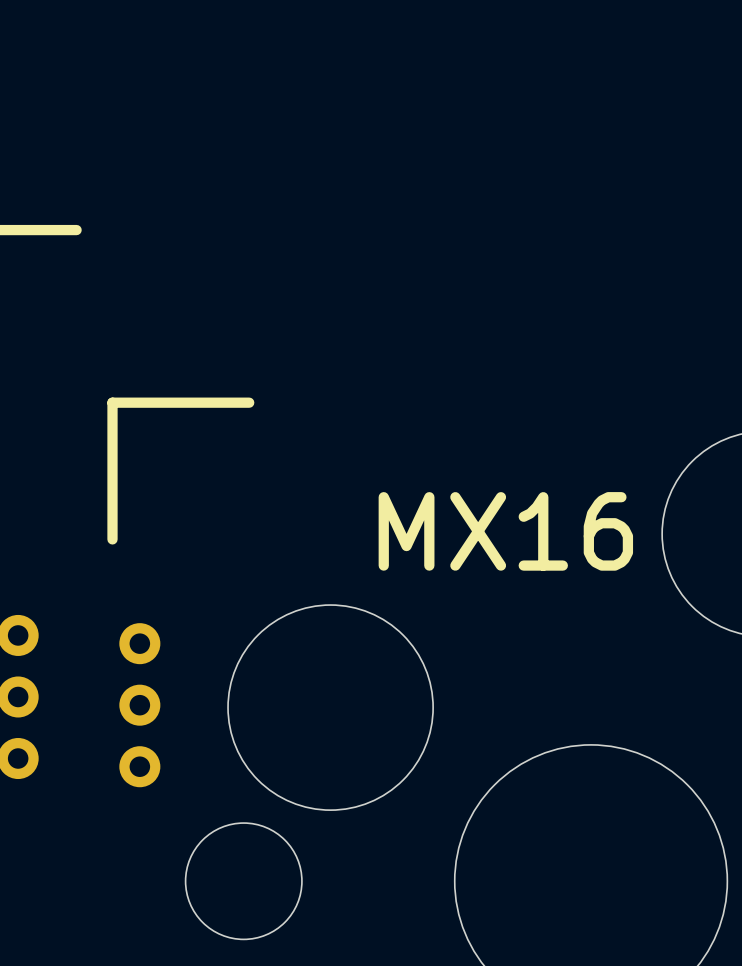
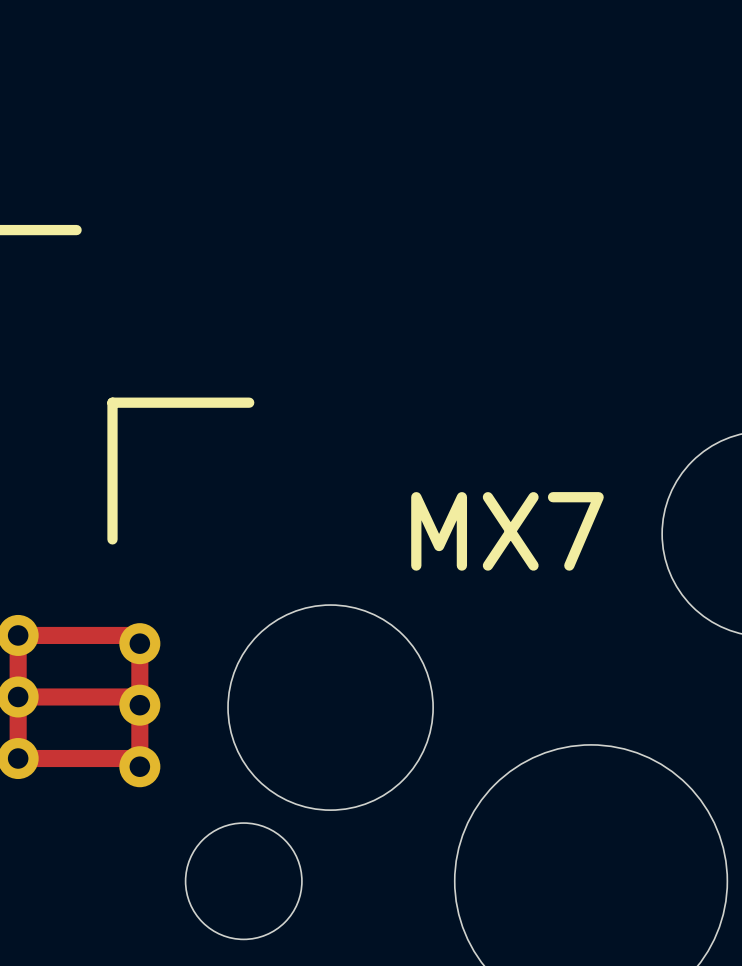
MX16 name: MX16 (505, 531) -> MX7 (507, 531)
track: none -> (18, 635) (18, 758) (131, 758) (139, 766) (139, 643) (131, 635) (18, 635)
track: none -> (18, 696) (131, 696) (139, 705)

